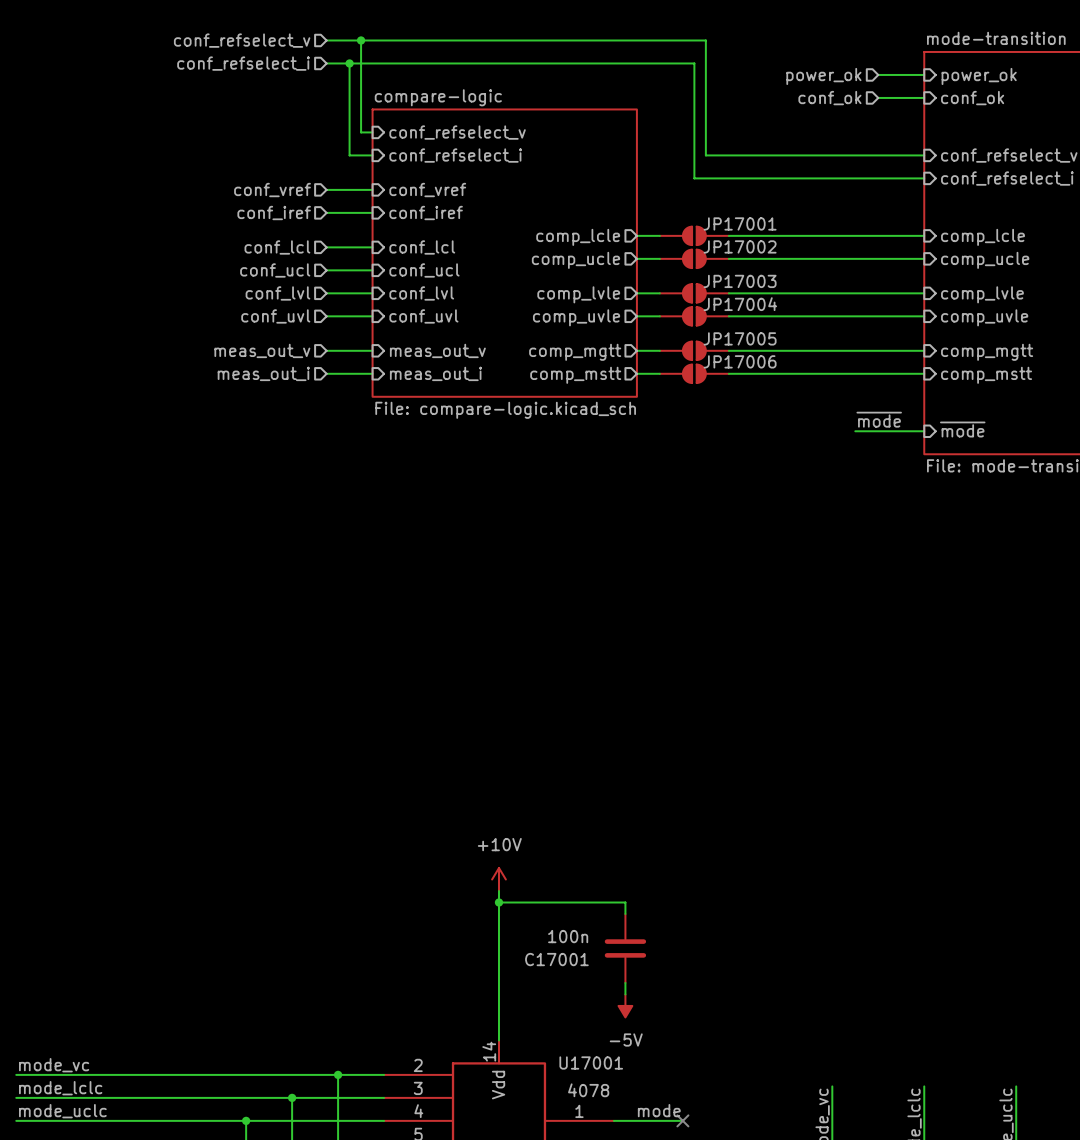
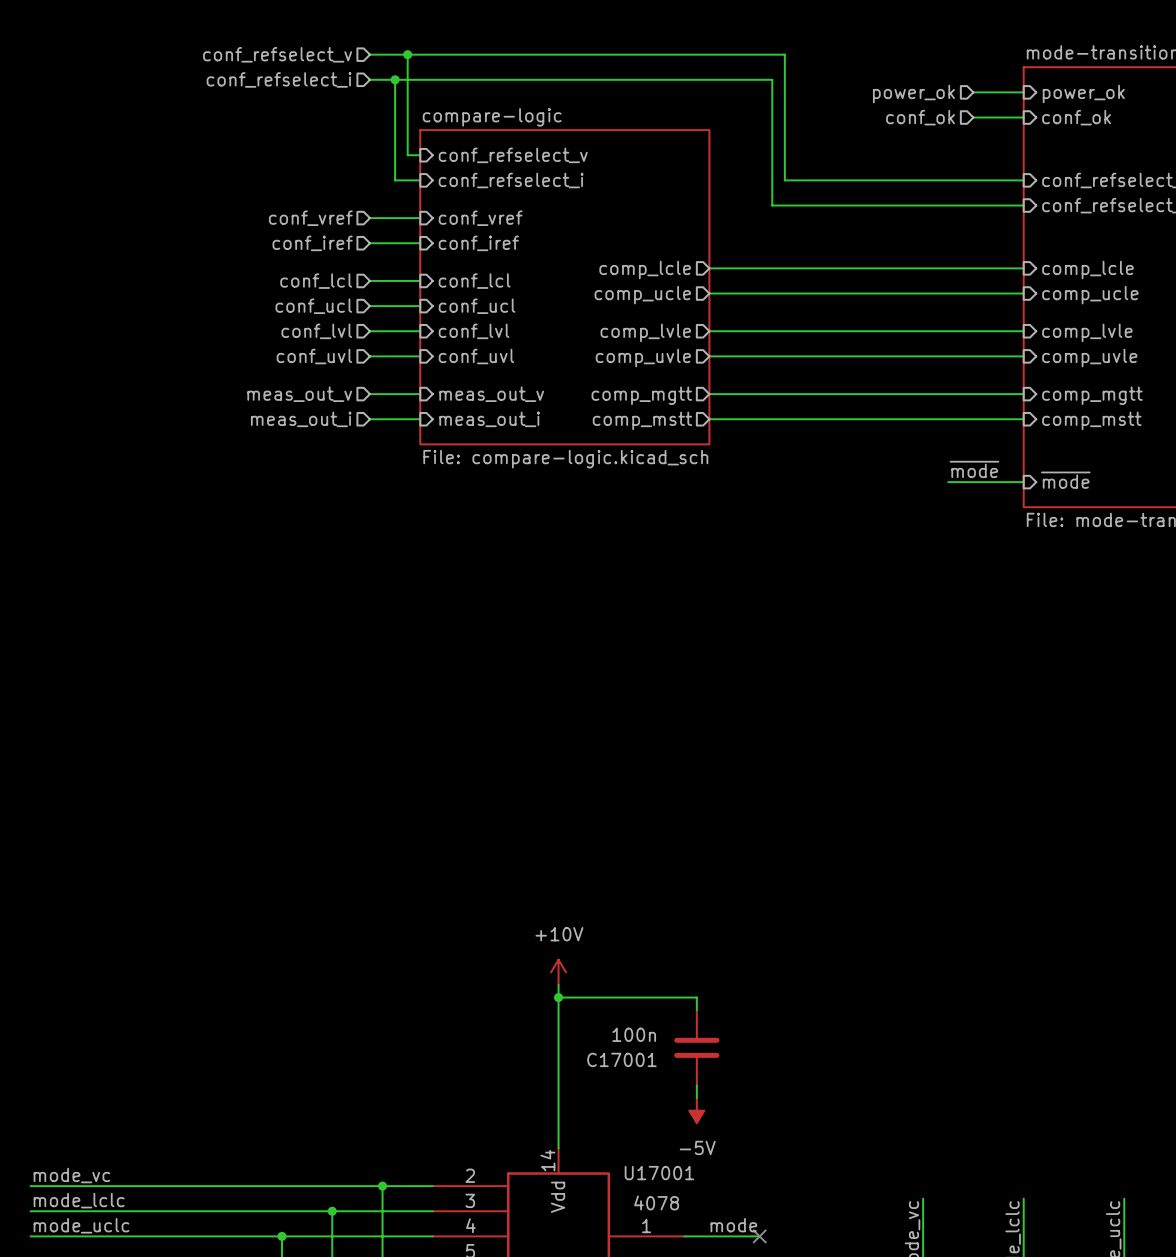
JP17001: (694, 235) -> none
JP17002: (694, 258) -> none
JP17003: (694, 293) -> none
JP17004: (694, 316) -> none
JP17005: (694, 350) -> none
JP17006: (694, 373) -> none

